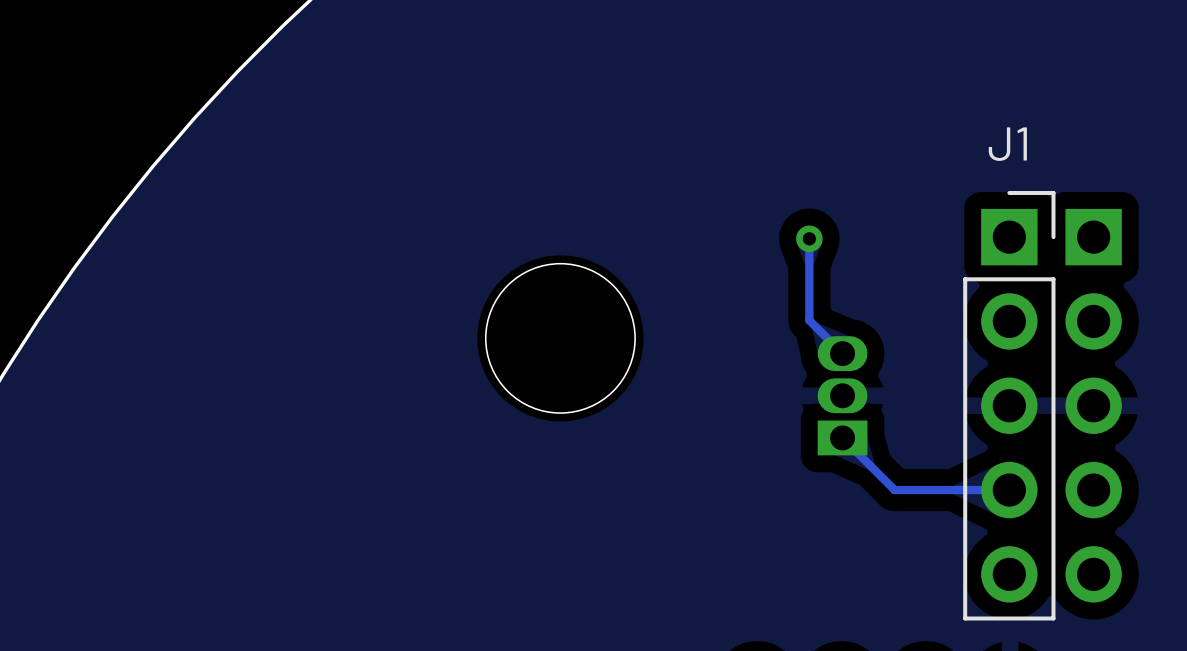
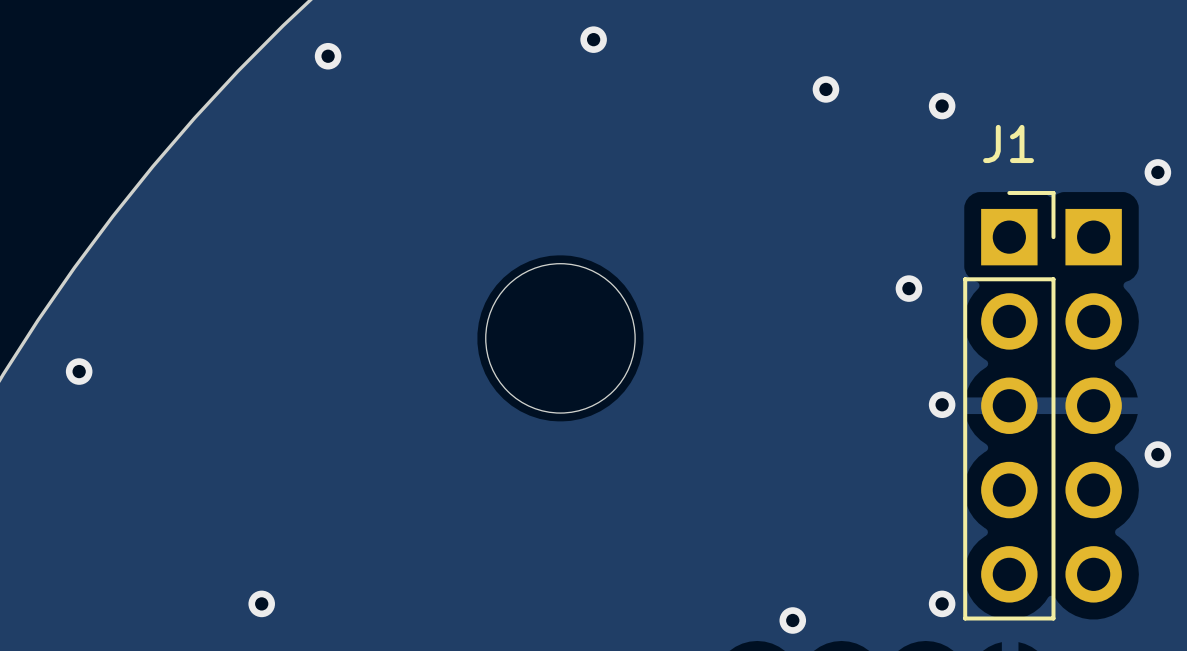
via: none -> (593, 39)
via: none -> (328, 56)
via: none -> (825, 89)
via: none -> (942, 106)
via: none -> (1157, 172)
track: (809, 238) (809, 320) (842, 353) -> none
via: (809, 238) -> none
via: none -> (908, 288)
via: none -> (79, 371)
part: (842, 395) -> none
via: none -> (942, 404)
track: (842, 437) (894, 490) (1009, 490) -> none
via: none -> (1157, 454)
via: none -> (261, 603)
via: none -> (942, 603)
via: none -> (792, 620)

